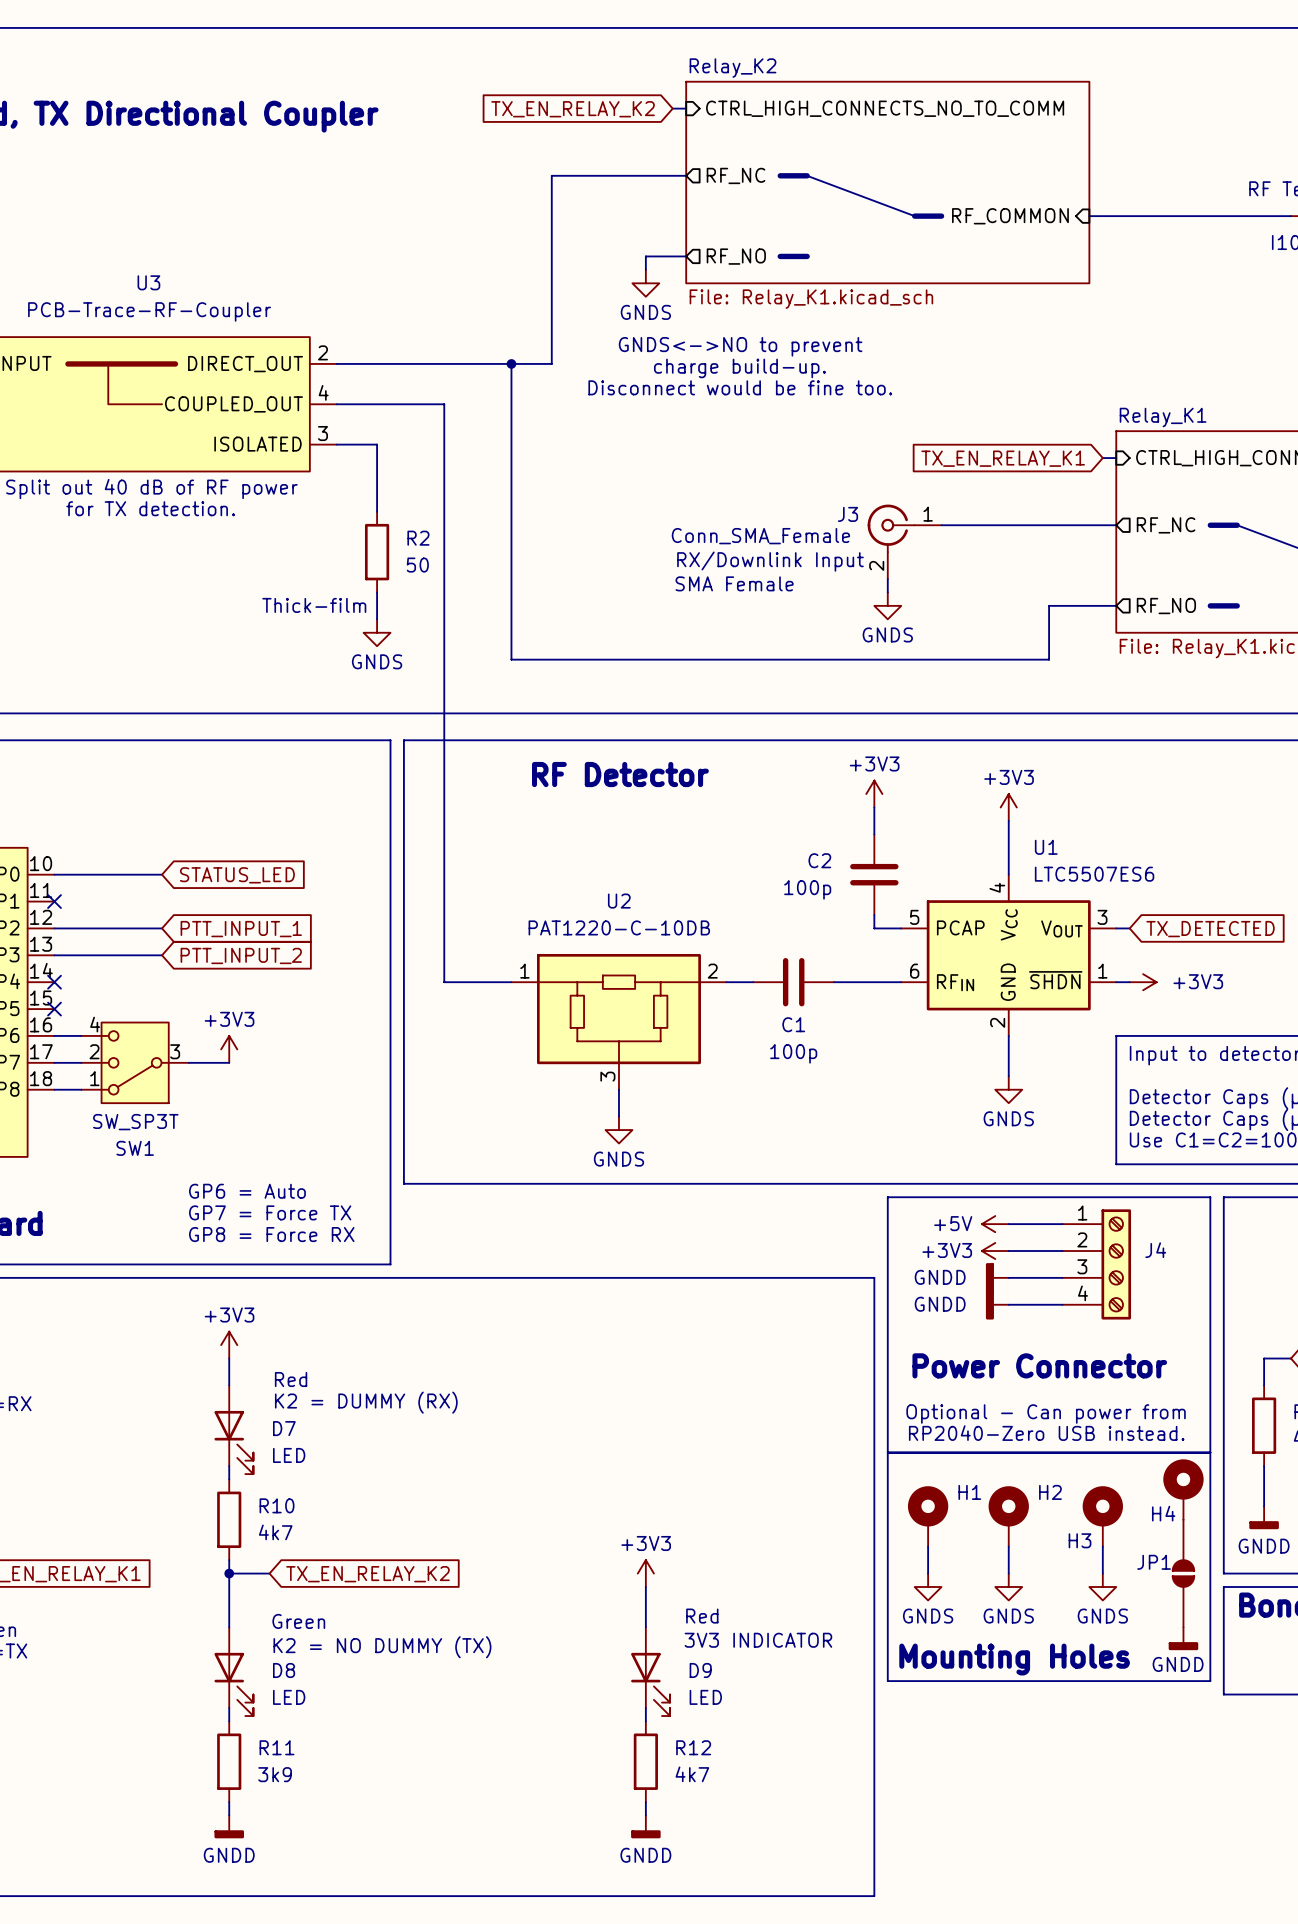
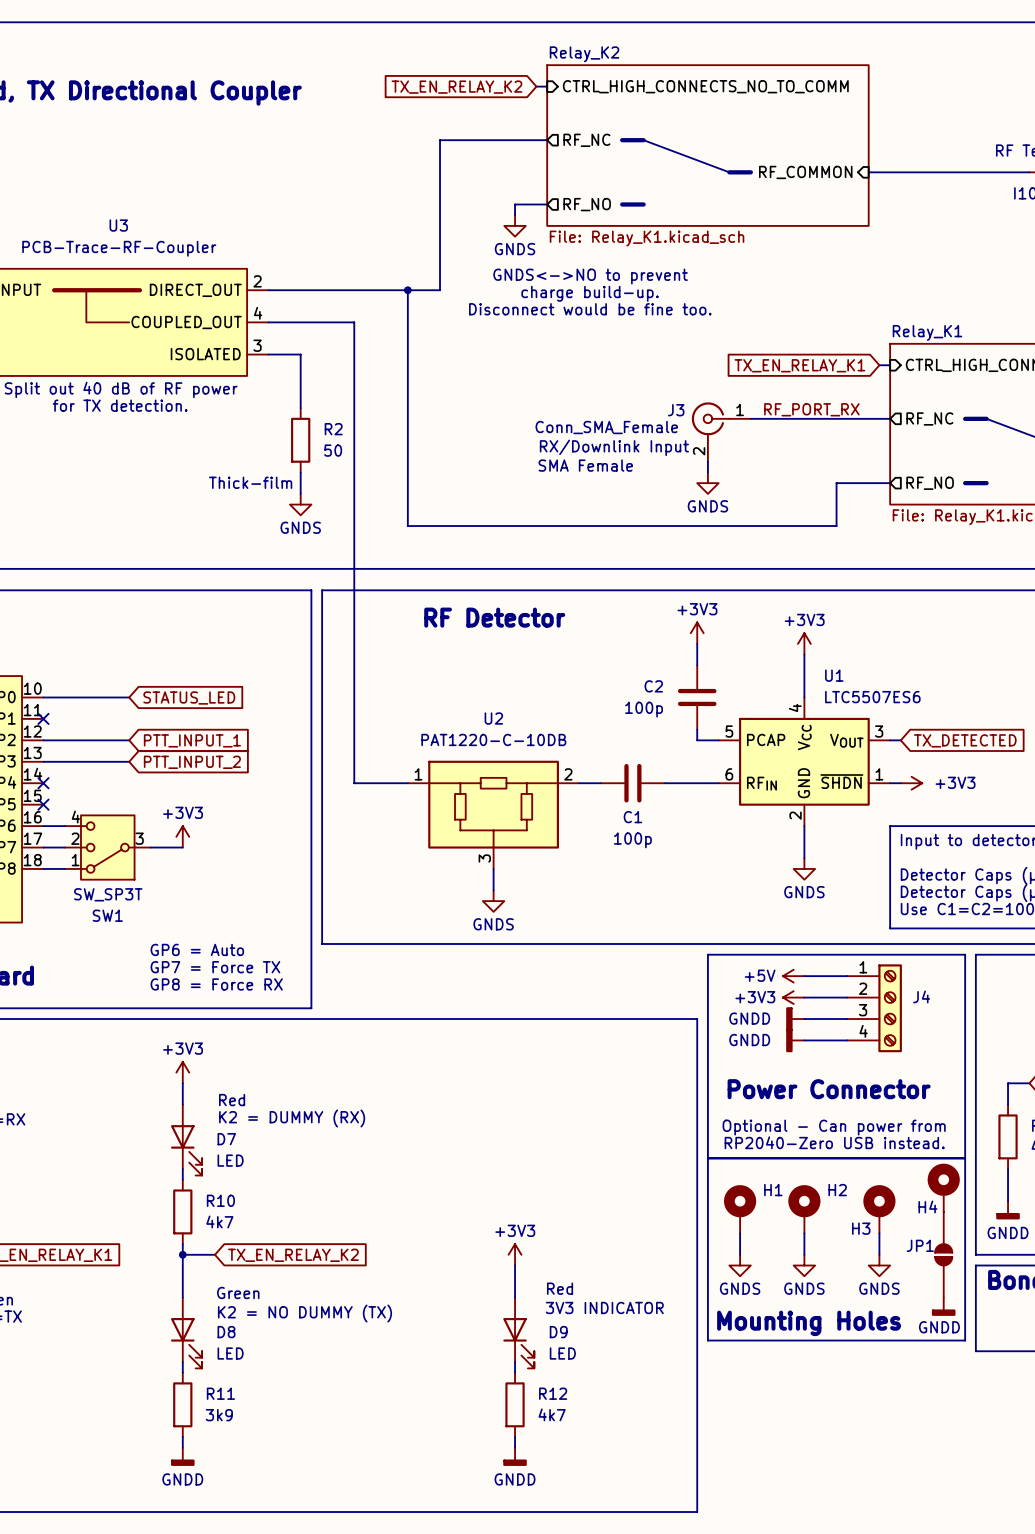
label: none -> RF_PORT_RX (811, 409)

